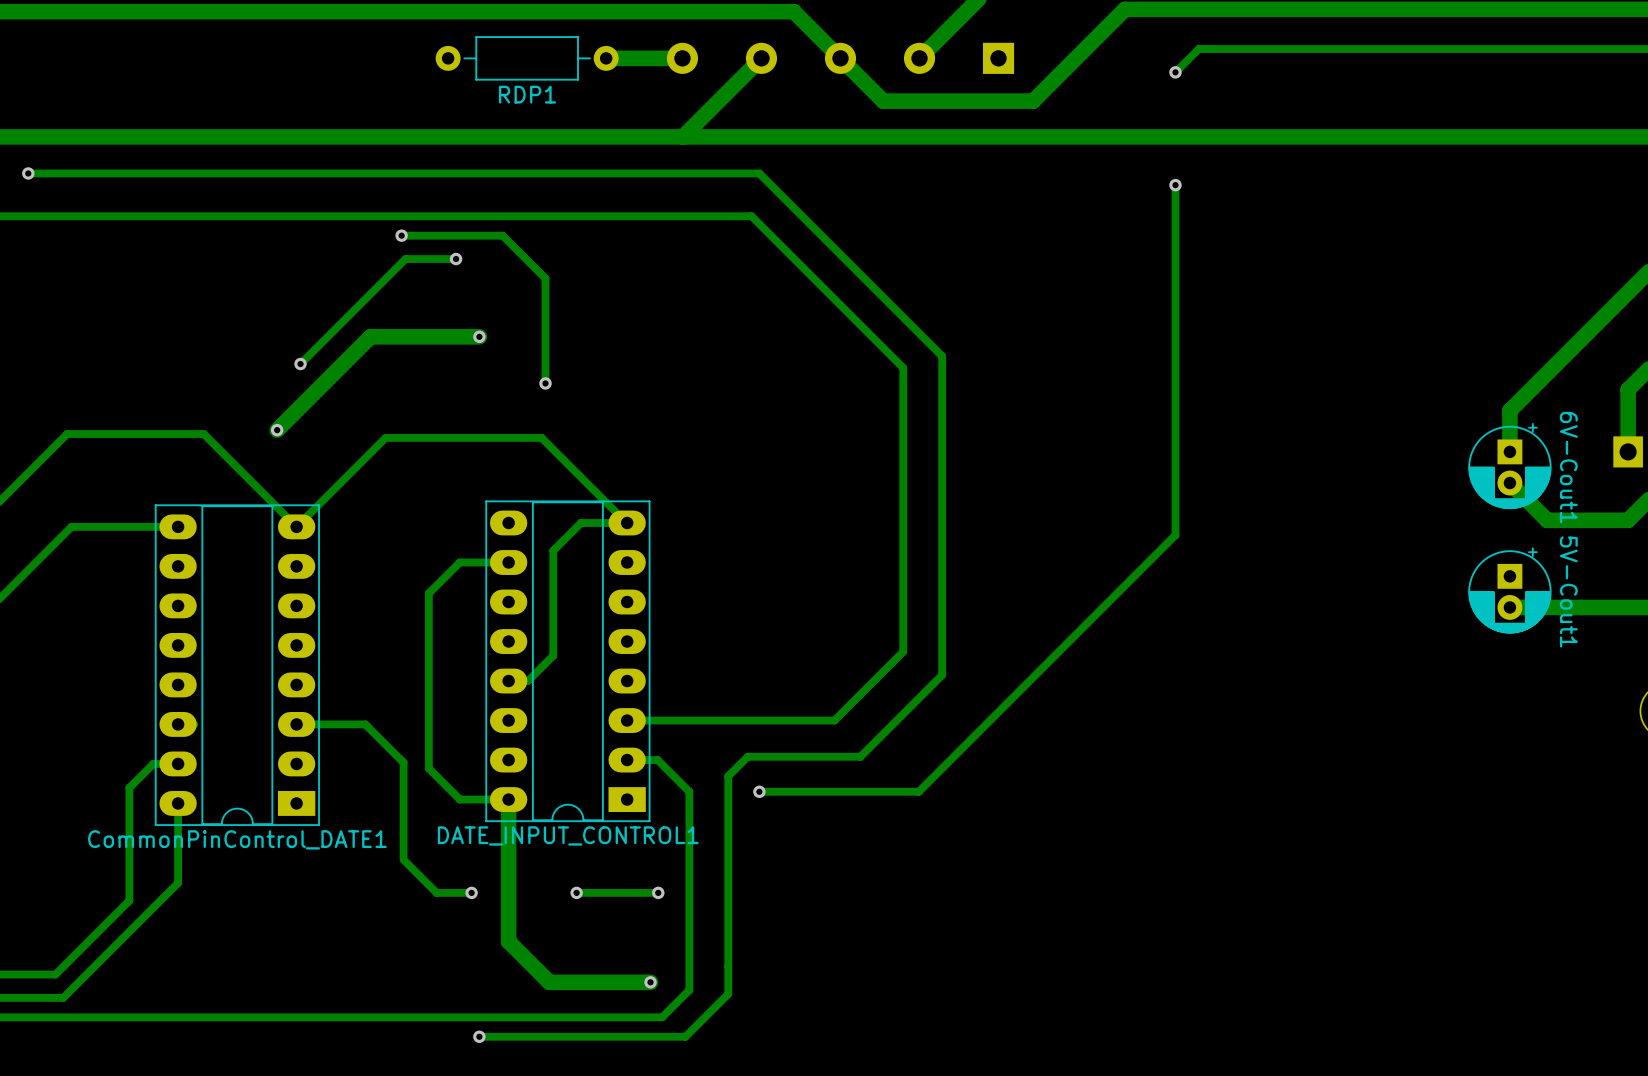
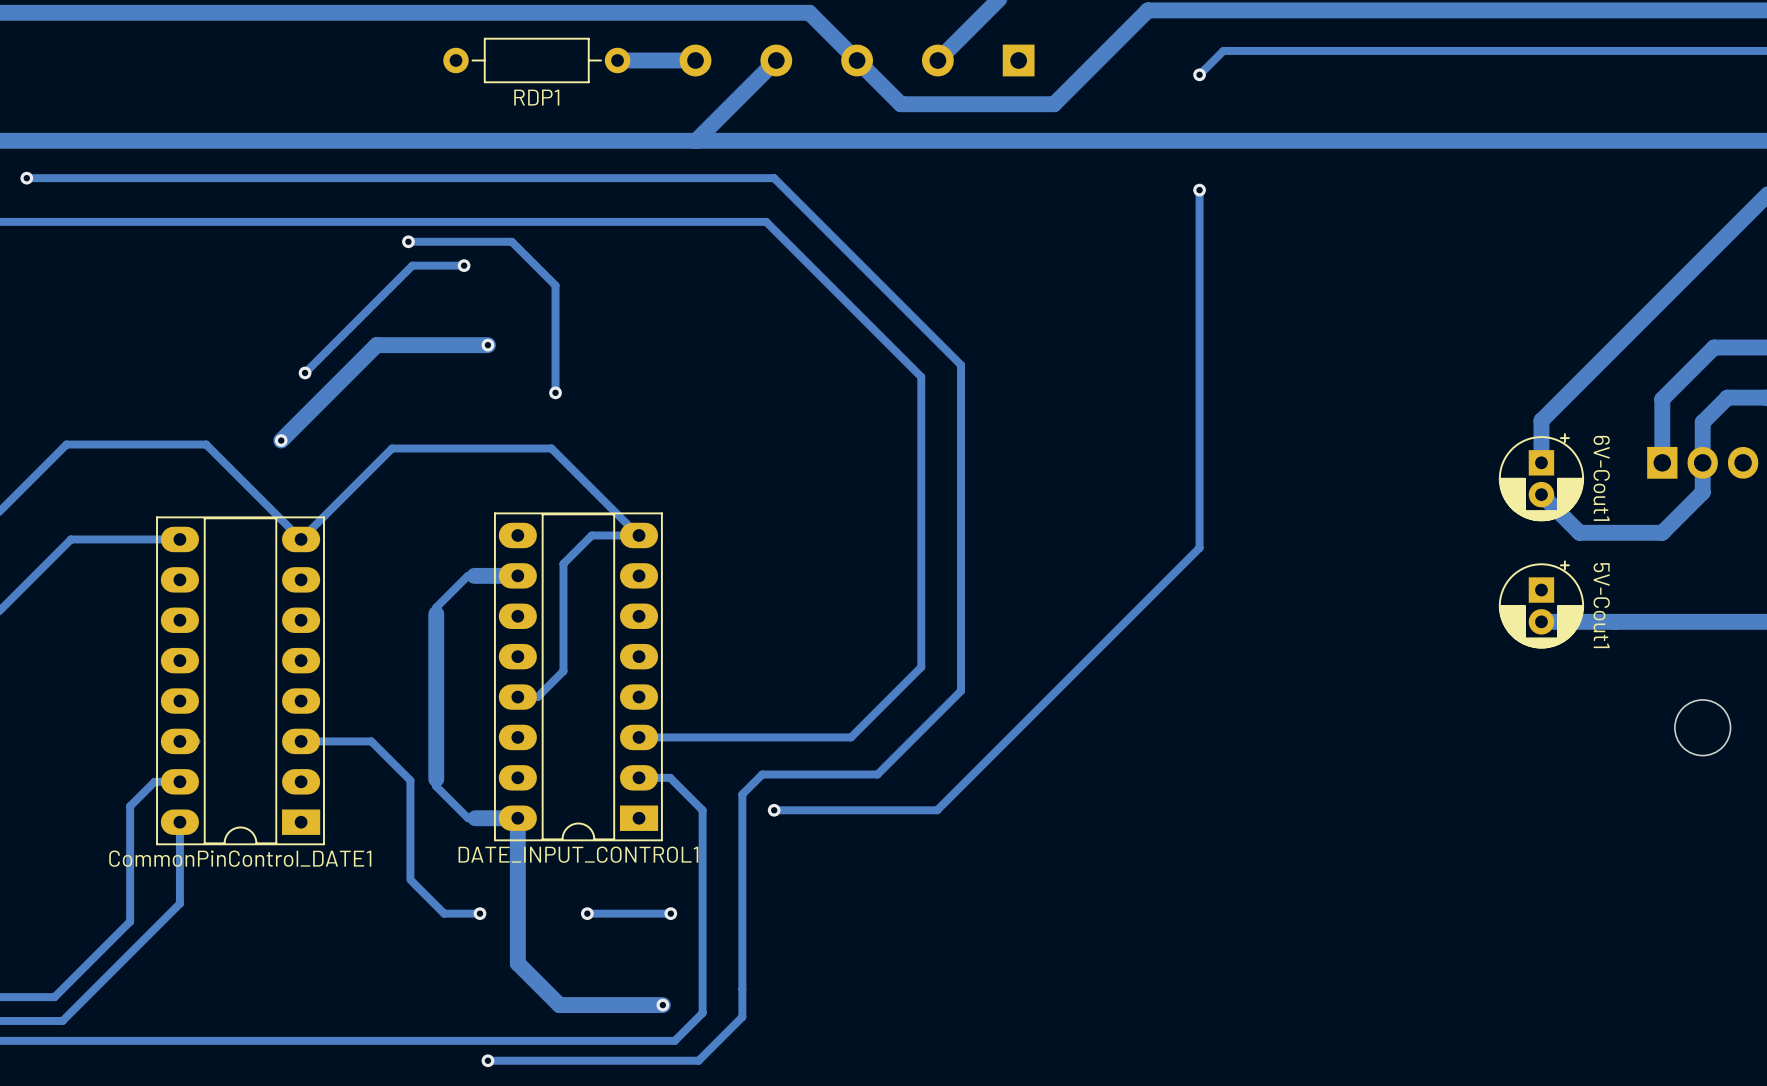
track width: thin (508, 562) (466, 562) -> thick (517, 575) (474, 575)
track width: thin (428, 599) (428, 761) -> thick (436, 613) (436, 779)
track width: thin (508, 799) (466, 799) -> thick (517, 818) (475, 818)

